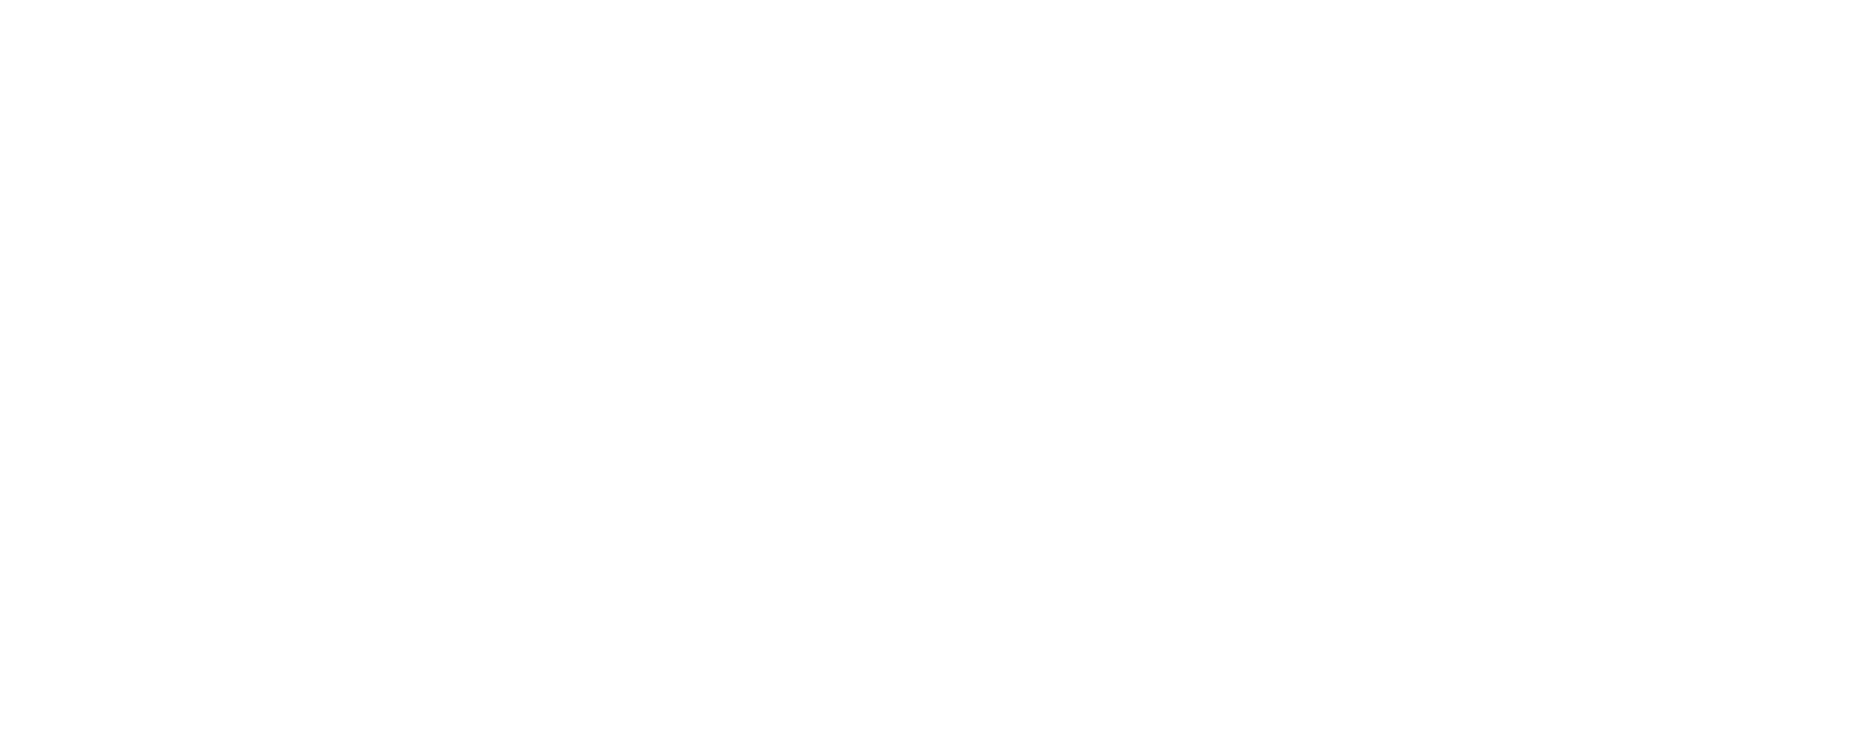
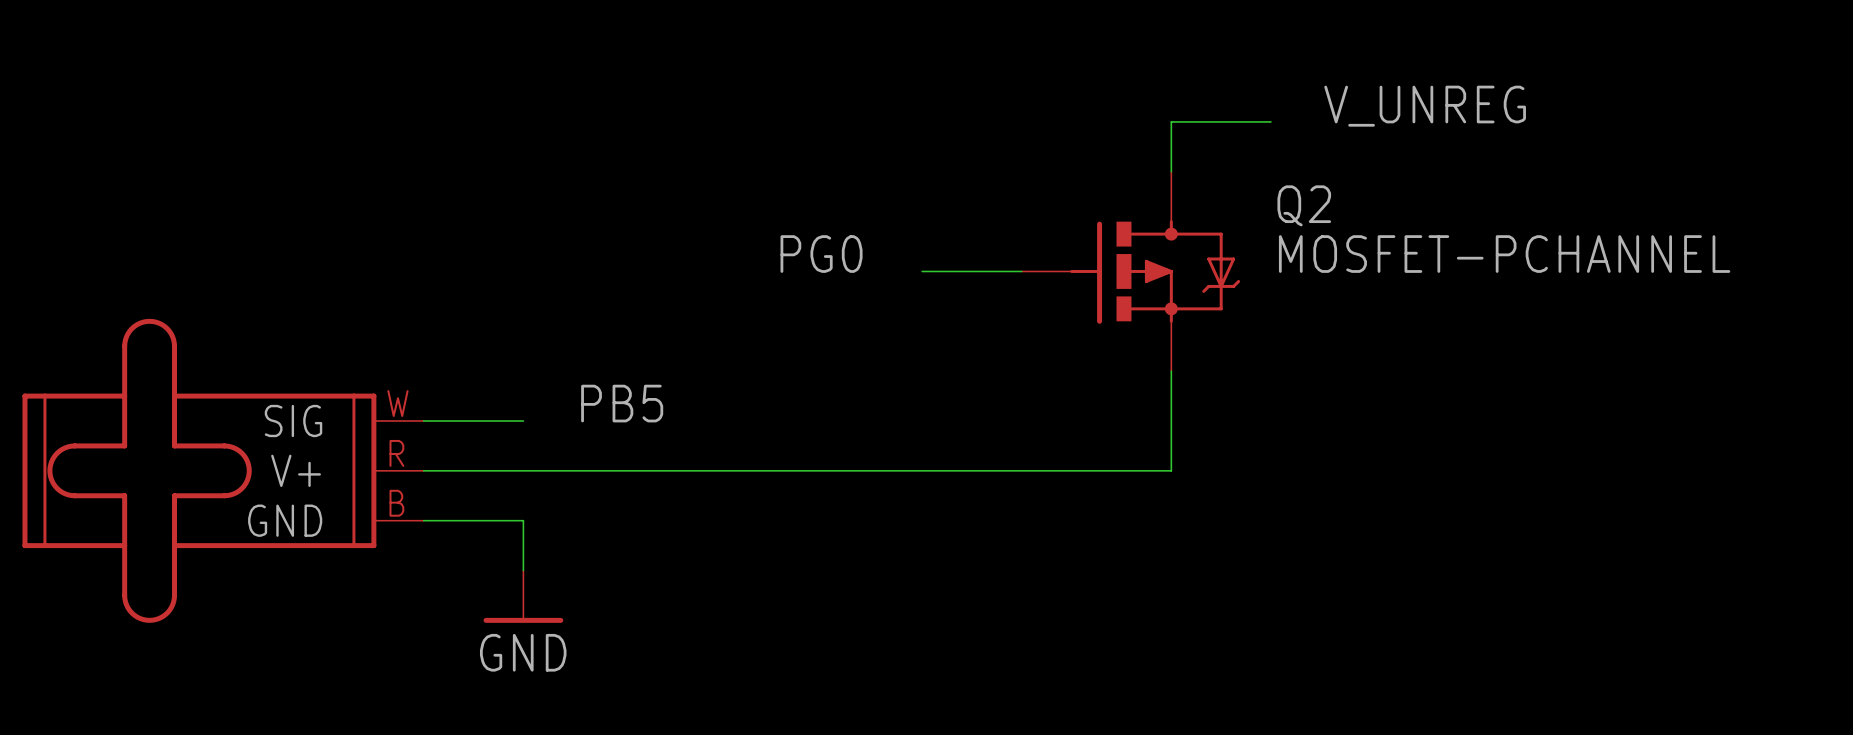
label: none -> V_UNREG (1425, 106)
wire: none -> (1271, 121) (1171, 121) (1171, 171)
label: none -> PG0 (821, 254)
wire: none -> (922, 271) (1021, 271)
Q2: none -> MOSFET-PCHANNEL (1130, 271)
wire: none -> (1171, 371) (1171, 470) (423, 470)
label: none -> PB5 (622, 403)
wire: none -> (423, 421) (523, 421)
part: none -> (223, 470)
wire: none -> (423, 520) (523, 520) (523, 570)
power symbol: none -> GND (523, 596)

